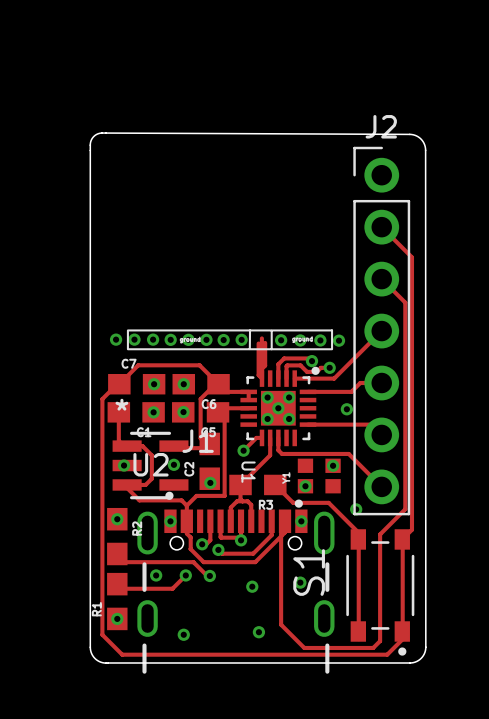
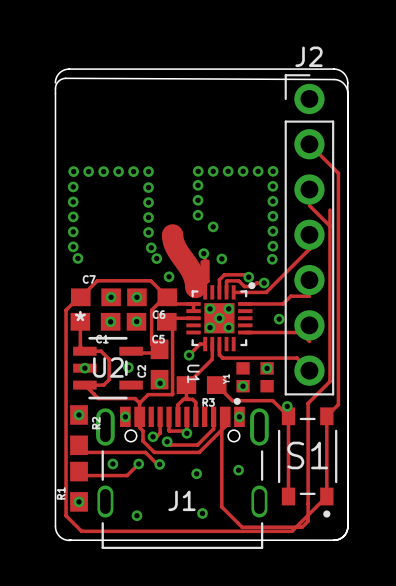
board edge: none -> (55, 82) (59, 73) (69, 69) (333, 69) (341, 71) (345, 75) (347, 82) (347, 526) (343, 536) (333, 540)
track: (381, 227) (411, 257) (411, 529) (402, 539) -> none
via: none -> (198, 171)
via: none -> (213, 171)
via: none -> (228, 171)
via: none -> (243, 171)
via: none -> (258, 171)
via: none -> (273, 171)
via: none -> (73, 171)
via: none -> (88, 171)
via: none -> (103, 171)
via: none -> (118, 171)
via: none -> (133, 171)
via: none -> (148, 171)
via: none -> (198, 185)
via: none -> (272, 186)
via: none -> (73, 186)
via: none -> (148, 187)
via: none -> (198, 200)
via: none -> (73, 201)
via: none -> (272, 201)
via: none -> (148, 202)
via: none -> (198, 215)
via: none -> (73, 216)
via: none -> (272, 216)
via: none -> (148, 217)
via: none -> (213, 226)
via: none -> (272, 231)
via: none -> (73, 231)
via: none -> (148, 232)
track: none -> (172, 234) (176, 248) (192, 272) (195, 287)
via: none -> (272, 246)
via: none -> (73, 246)
via: none -> (151, 247)
track: (381, 331) (332, 378) -> (309, 234) (309, 249) (266, 292)
J2 position: (381, 331) -> (309, 234)
via: none -> (203, 253)
via: (134, 339) -> none
via: (153, 339) -> none
via: (170, 339) -> none
via: (188, 339) -> none
part: (229, 339) -> none
via: (241, 339) -> none
via: (223, 340) -> none
via: (300, 340) -> none
via: (320, 340) -> none
via: none -> (169, 276)
U2 footprint: [112, 431, 189, 500] -> [73, 336, 143, 400]
J1 name position: J1 (198, 441) -> J1 (181, 500)
track: (348, 453) (381, 486) -> (280, 358) (296, 358) (309, 370)
track: (405, 480) (405, 509) (380, 534) -> (329, 381) (308, 403) (308, 428)
J1 footprint: [137, 491, 335, 674] -> [96, 406, 269, 550]
track: (328, 502) (358, 532) (358, 539) -> (263, 400) (272, 400) (288, 416) (288, 496)
track: (358, 547) (358, 639) -> none
track: (402, 547) (402, 639) (387, 654) (122, 654) (120, 652) -> (309, 144) (338, 173) (338, 404) (326, 416) (326, 496) (292, 531) (81, 531)
S1 name rotation: 0° (309, 572) -> 90° clockwise (307, 455)
S1 name position: S1 (309, 572) -> S1 (307, 455)
S1 position: (380, 592) -> (307, 462)

